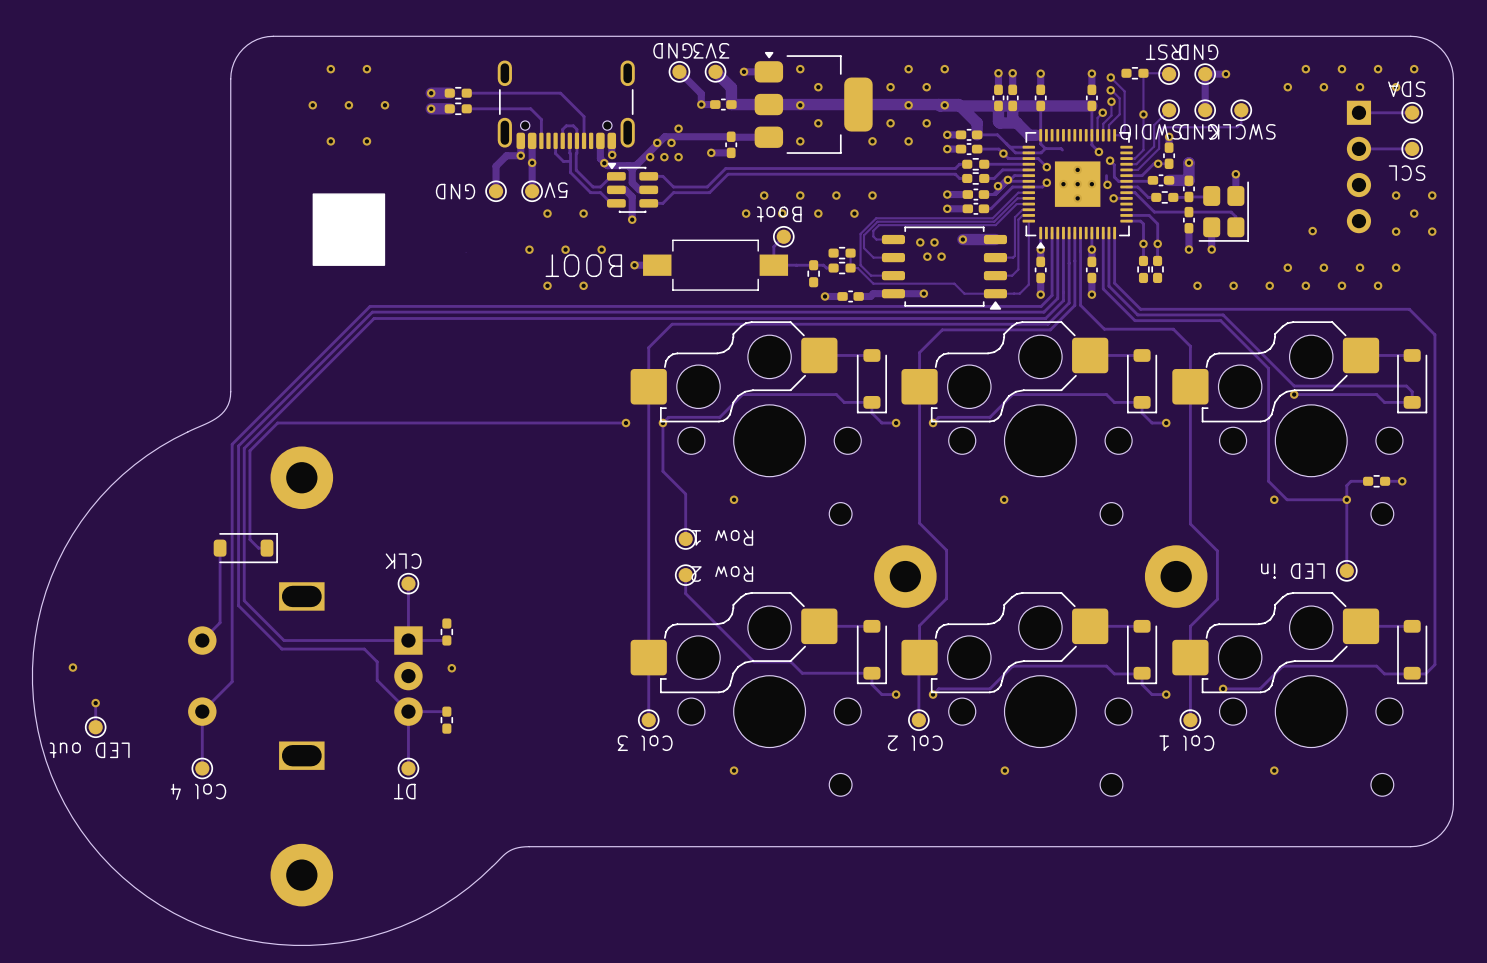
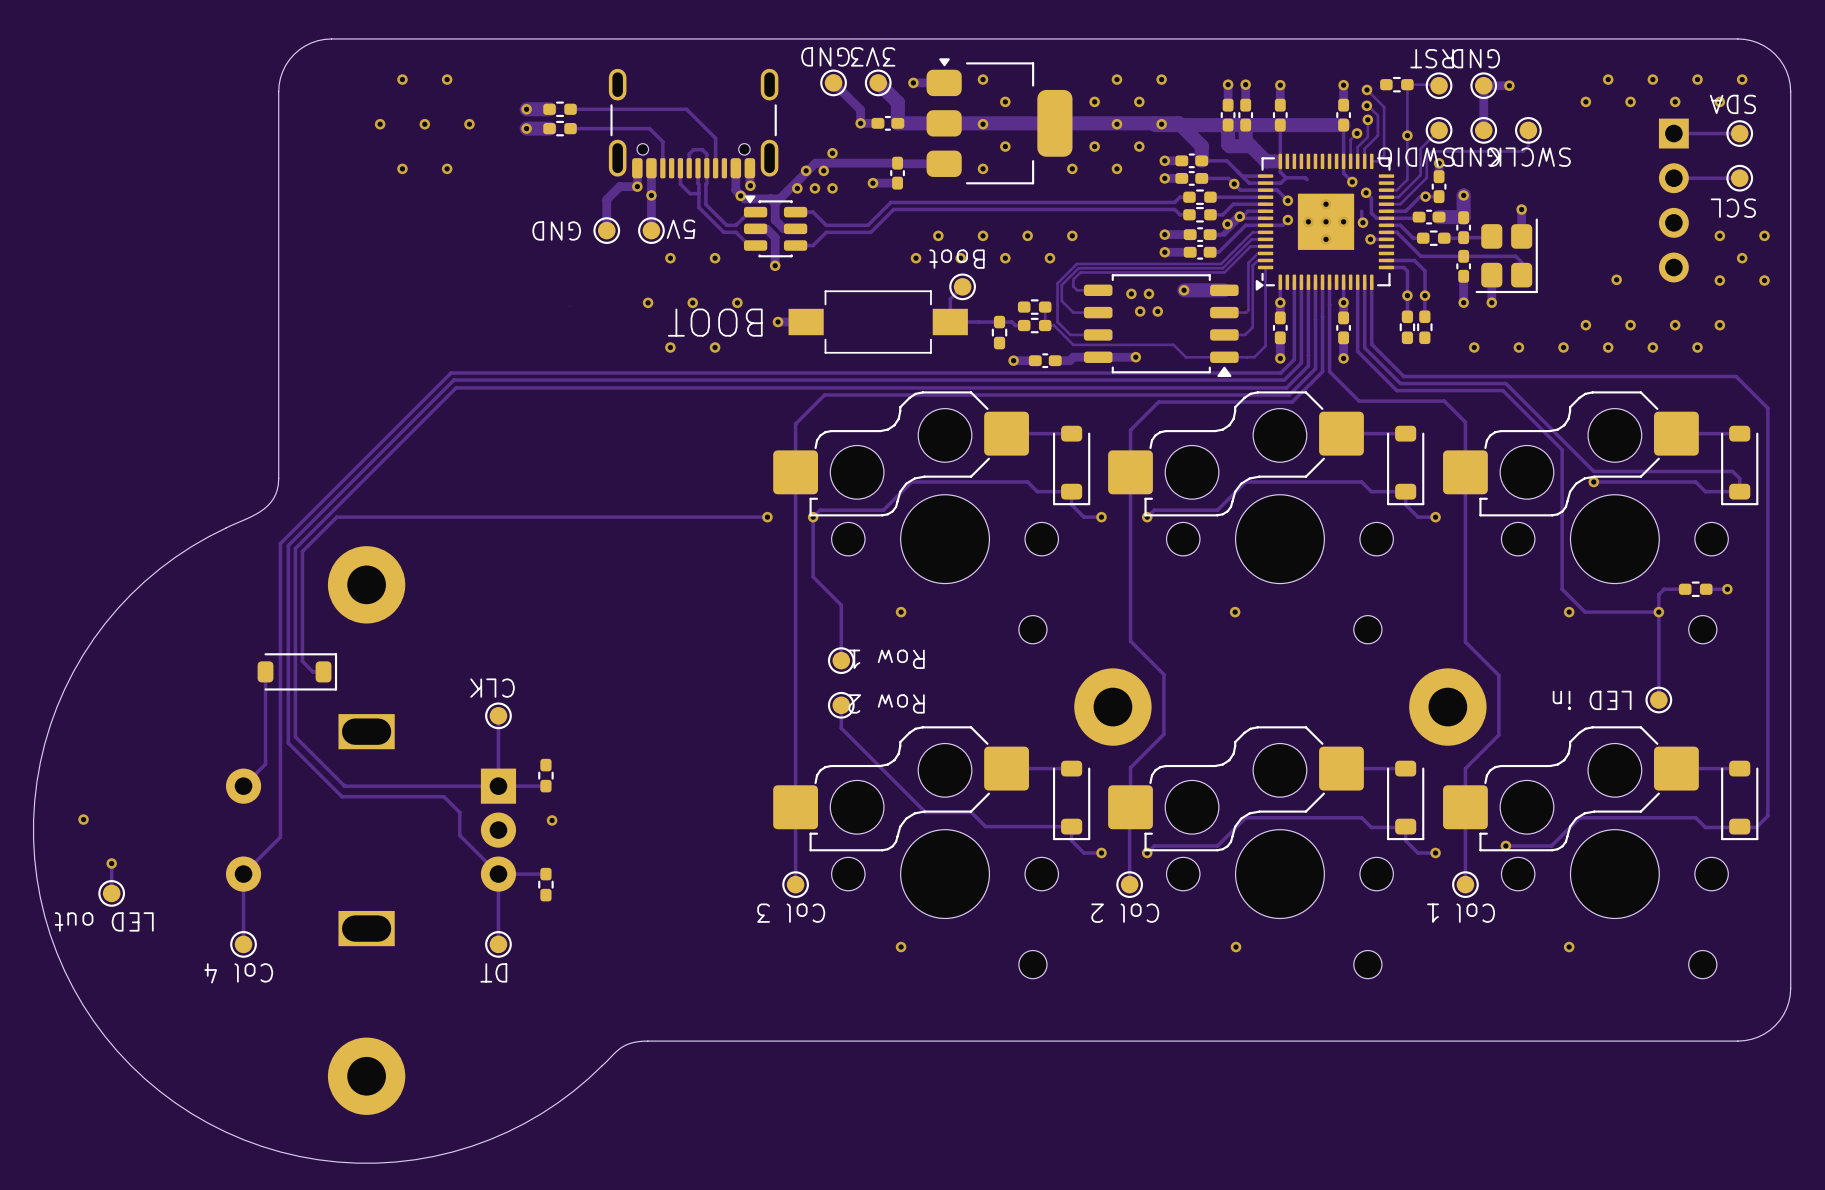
part footprint: [1022, 129, 1133, 249] -> [1255, 153, 1395, 291]
drawing: [312, 193, 386, 266] -> none

